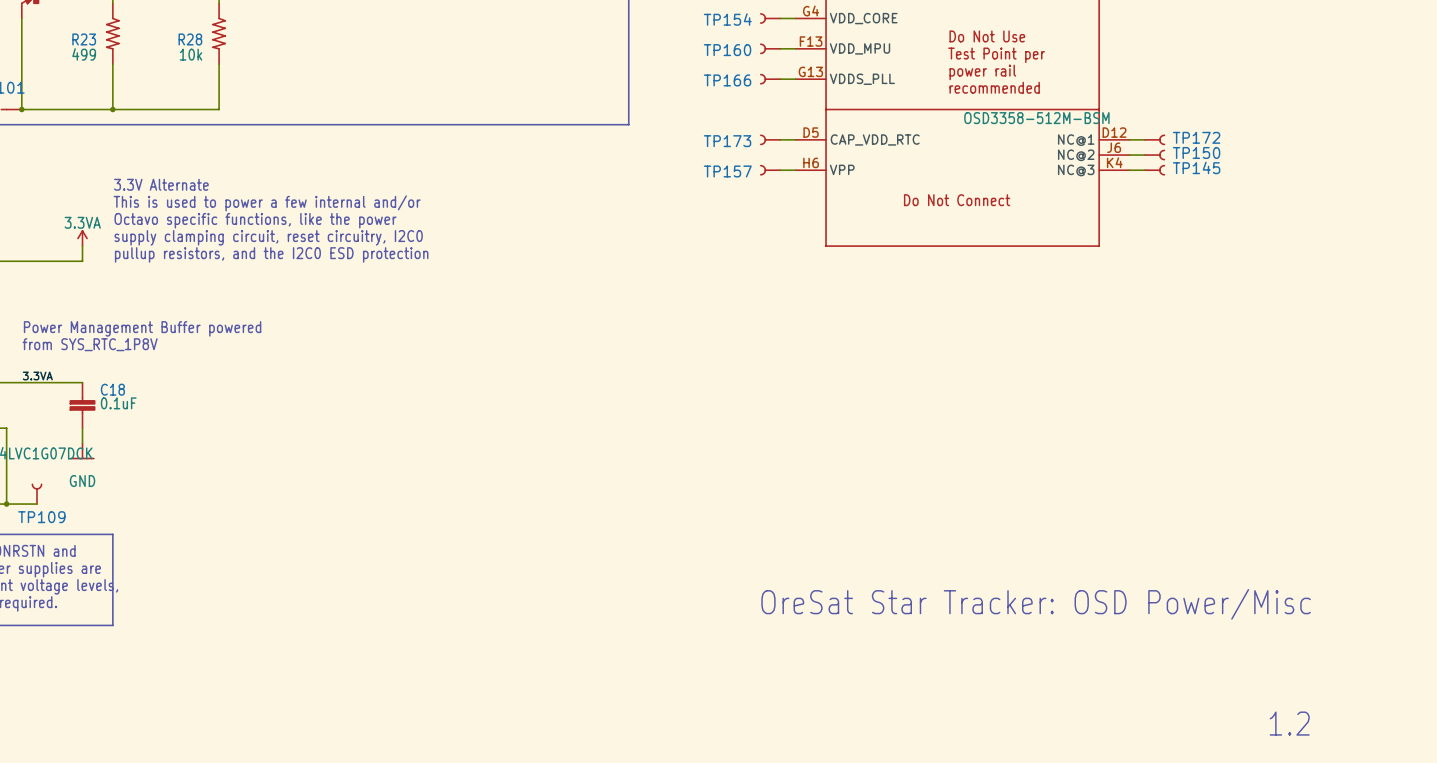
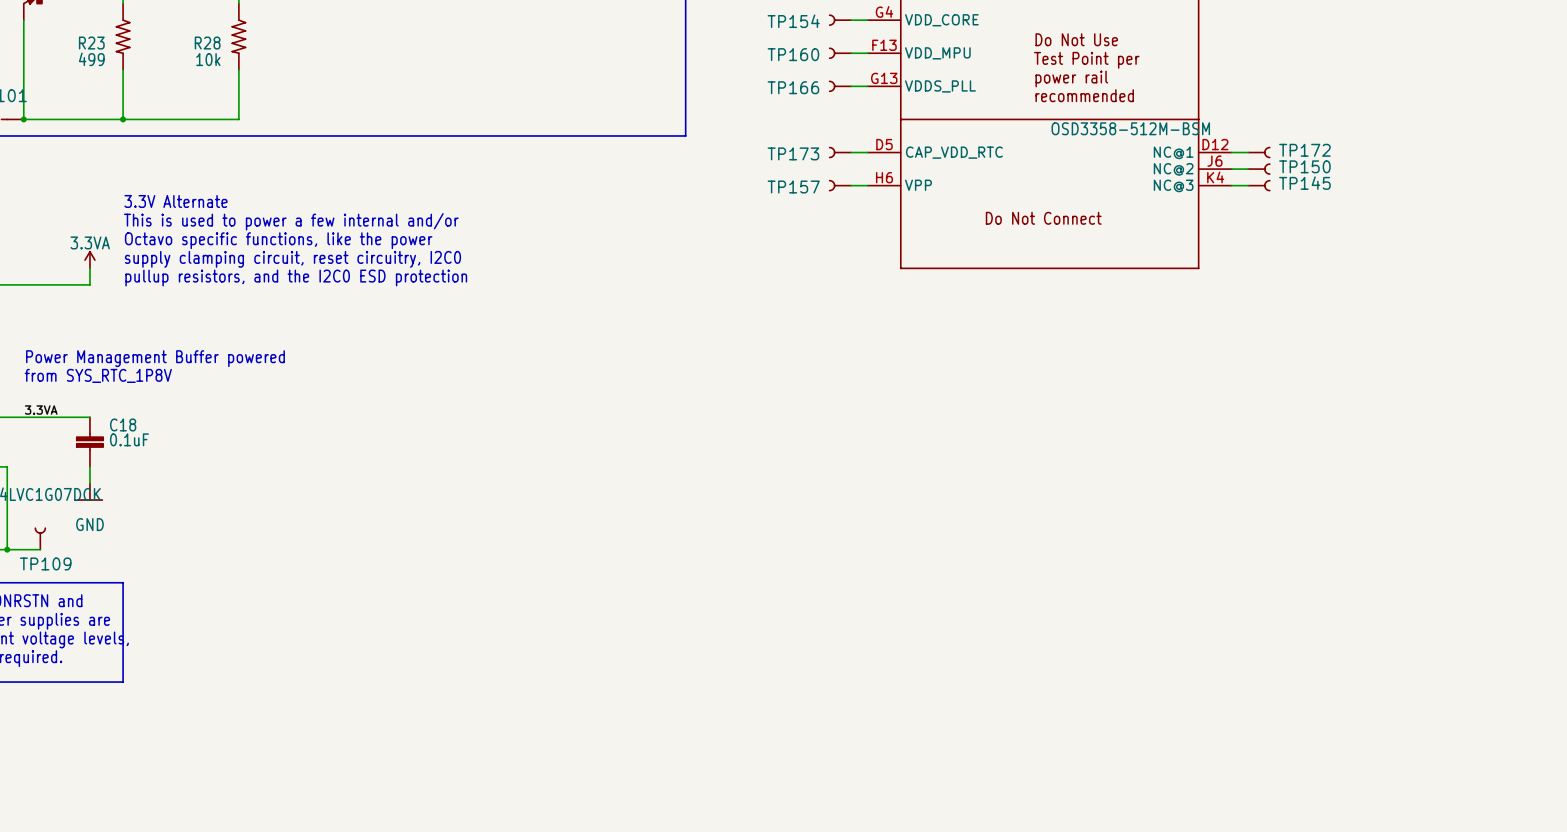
text: OreSat Star Tracker: OSD Power/Misc (1036, 604) -> none
text: 1.2 (1289, 723) -> none

